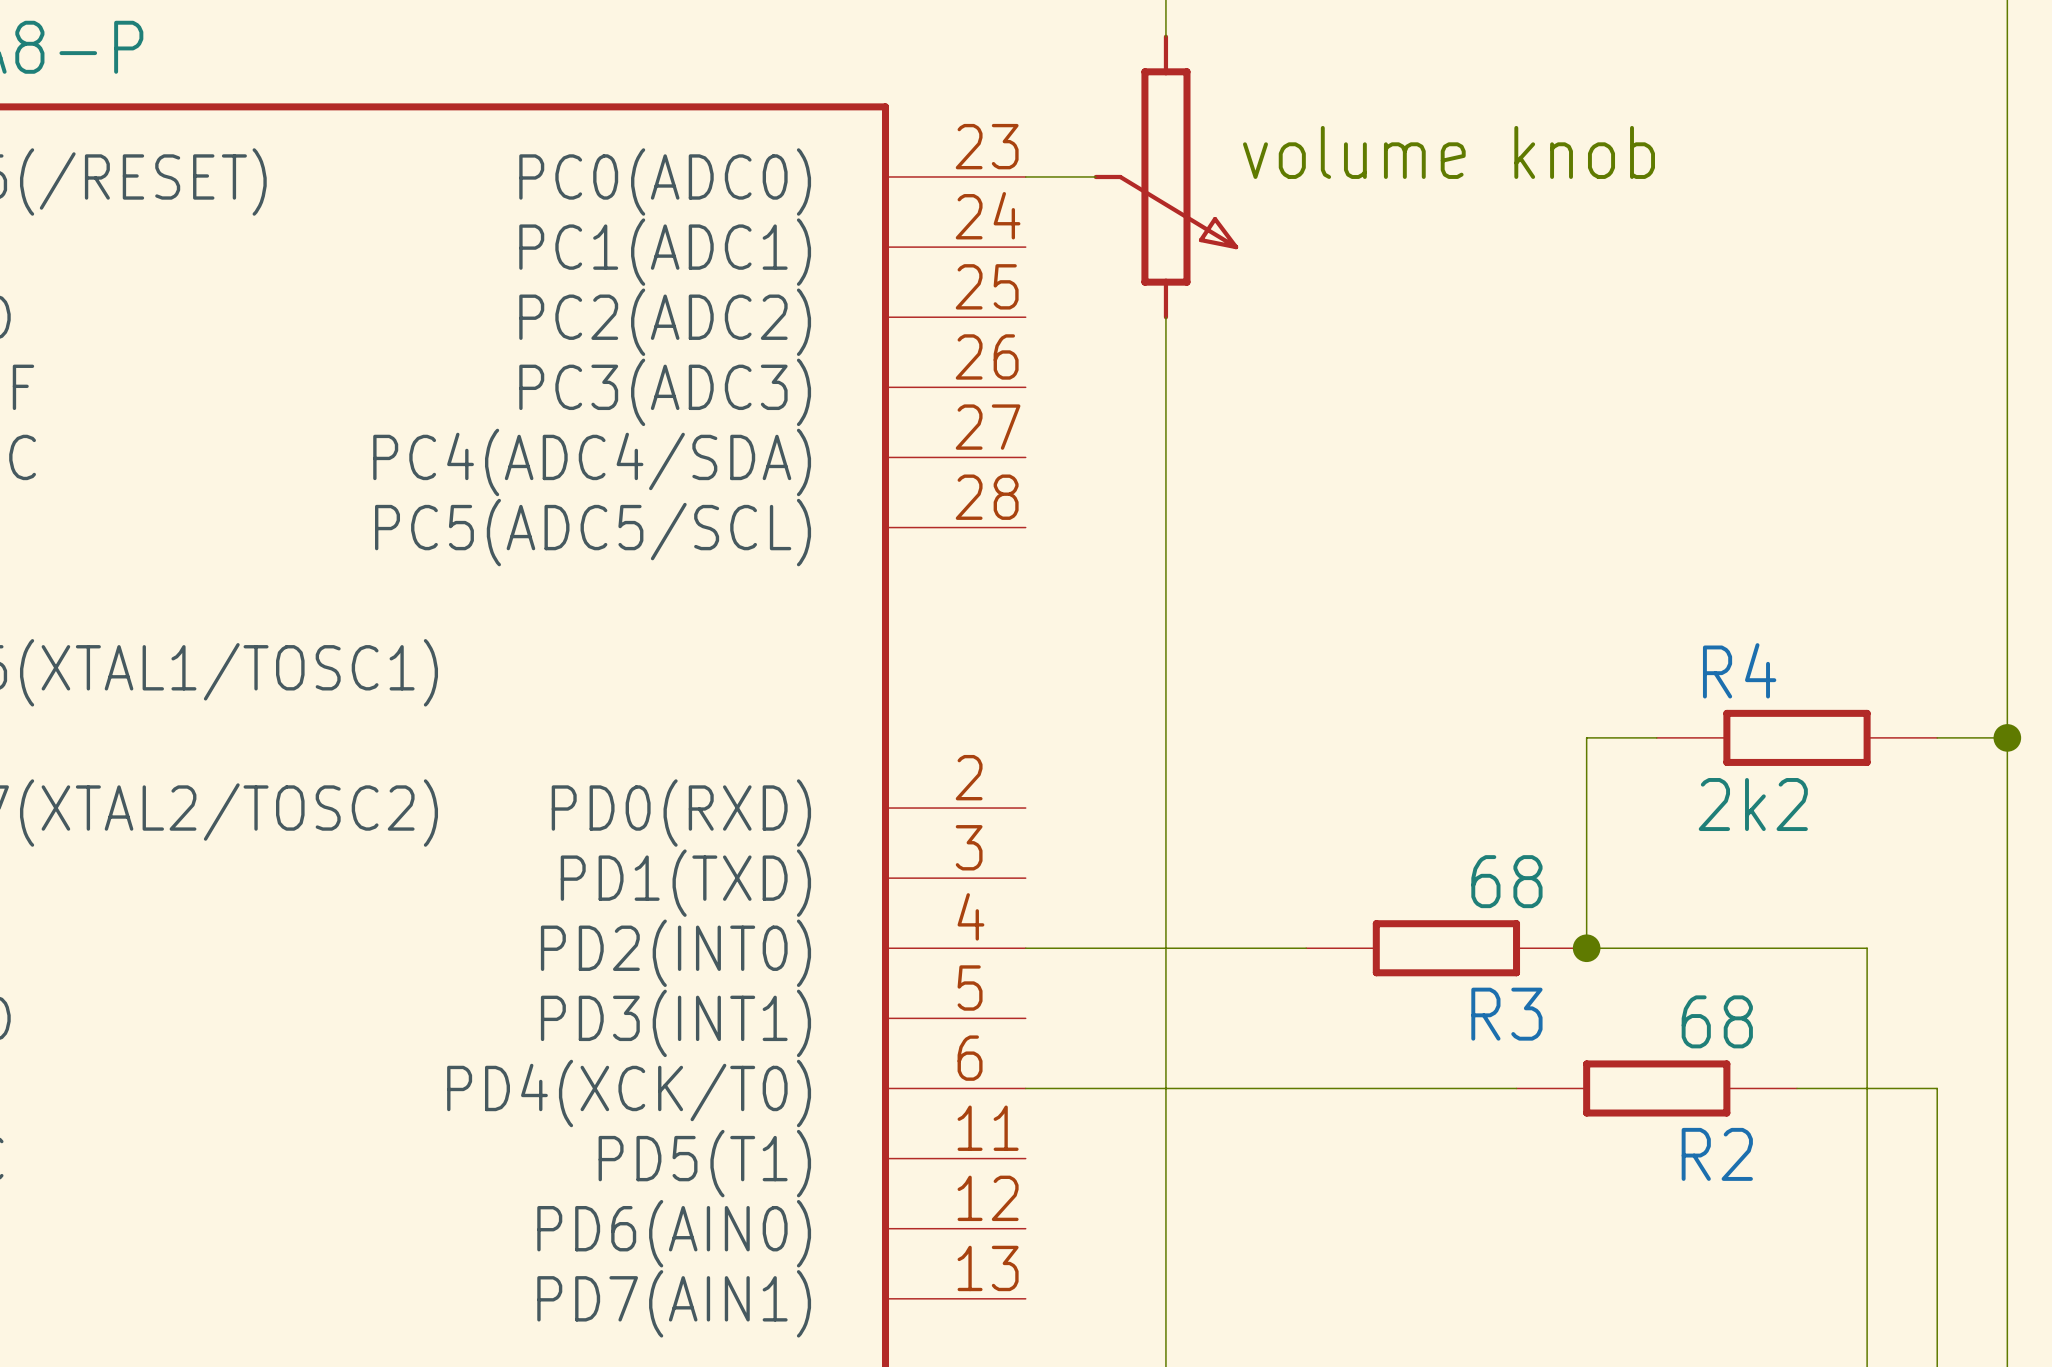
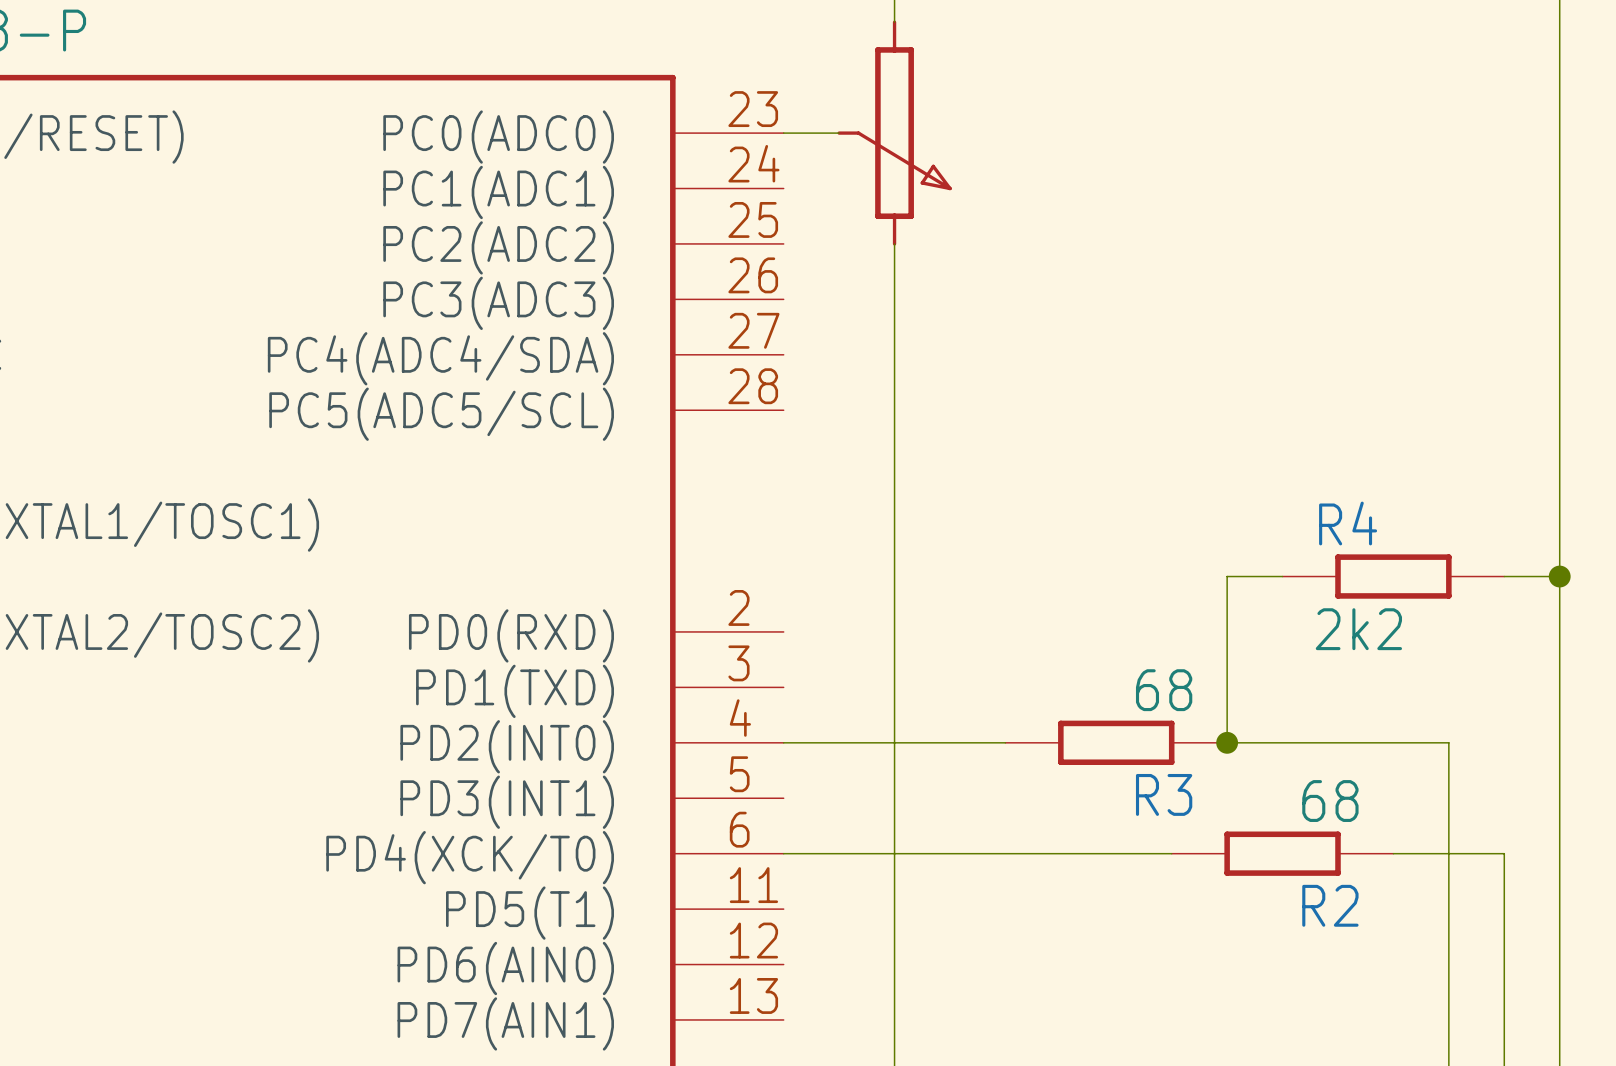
text: volume knob (1449, 152) -> none

